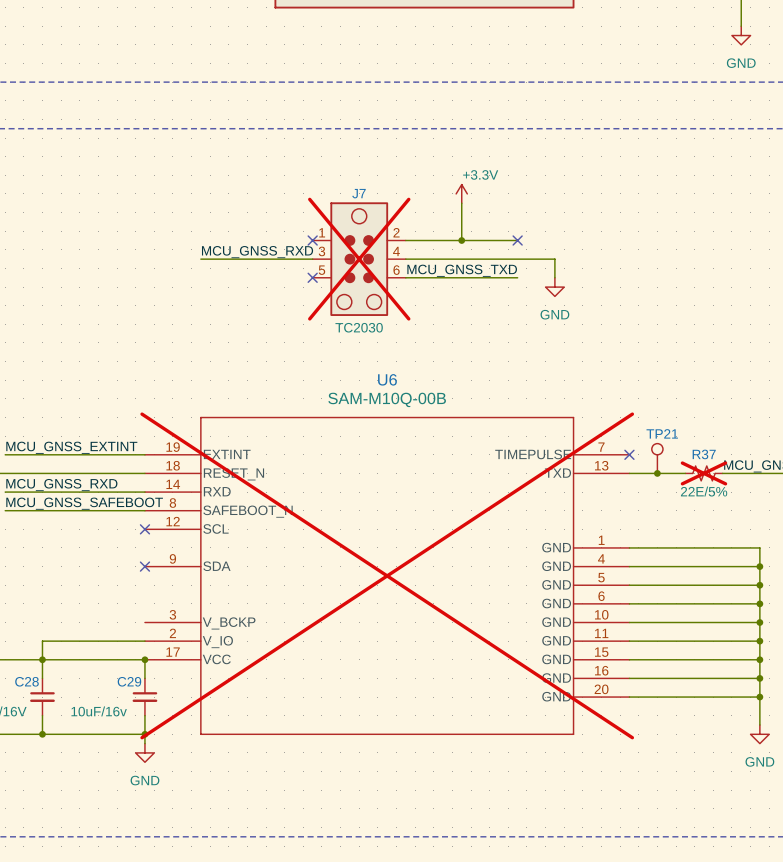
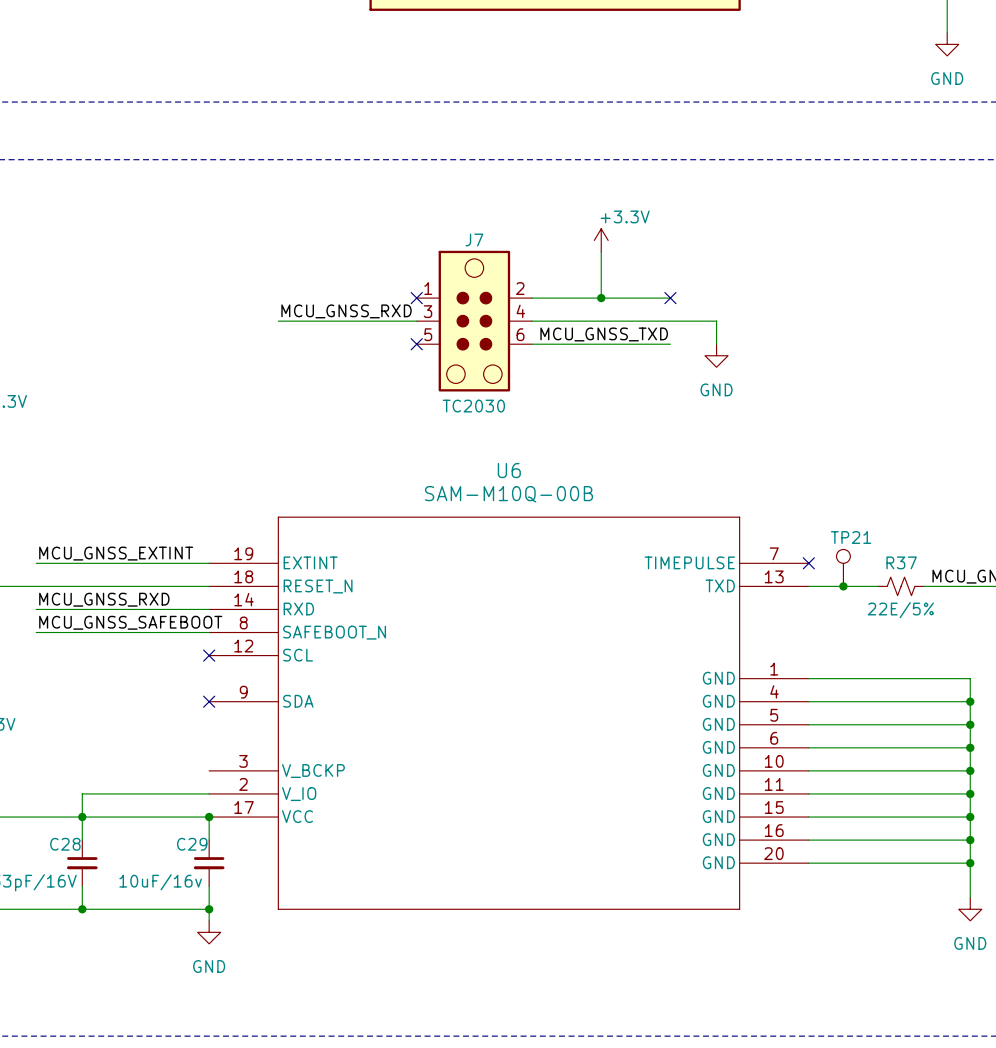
J7 do-not-place cross: (359, 259) -> none
R37 do-not-place cross: (703, 473) -> none
U6 do-not-place cross: (387, 575) -> none

